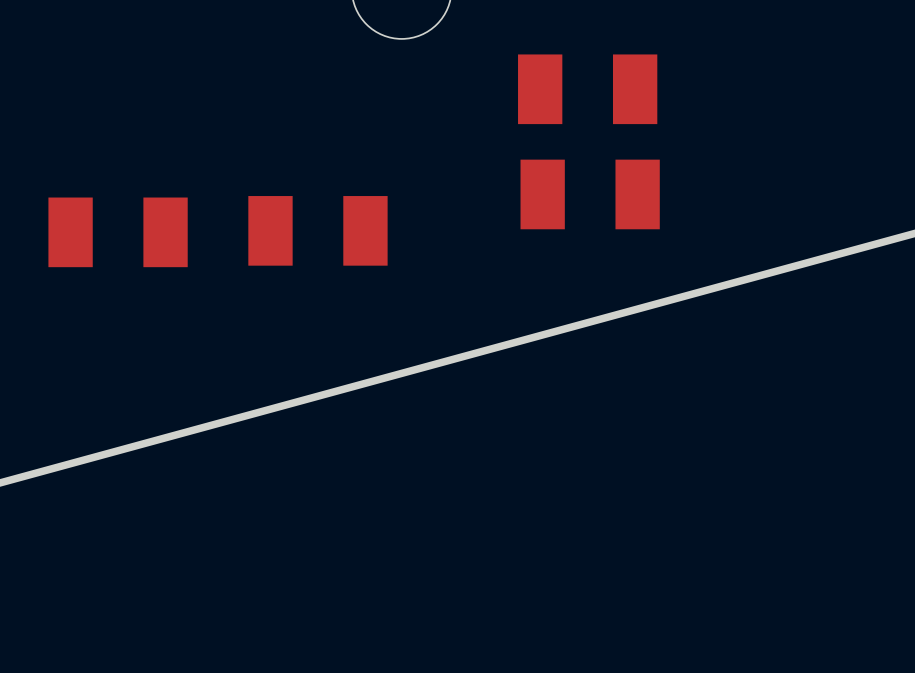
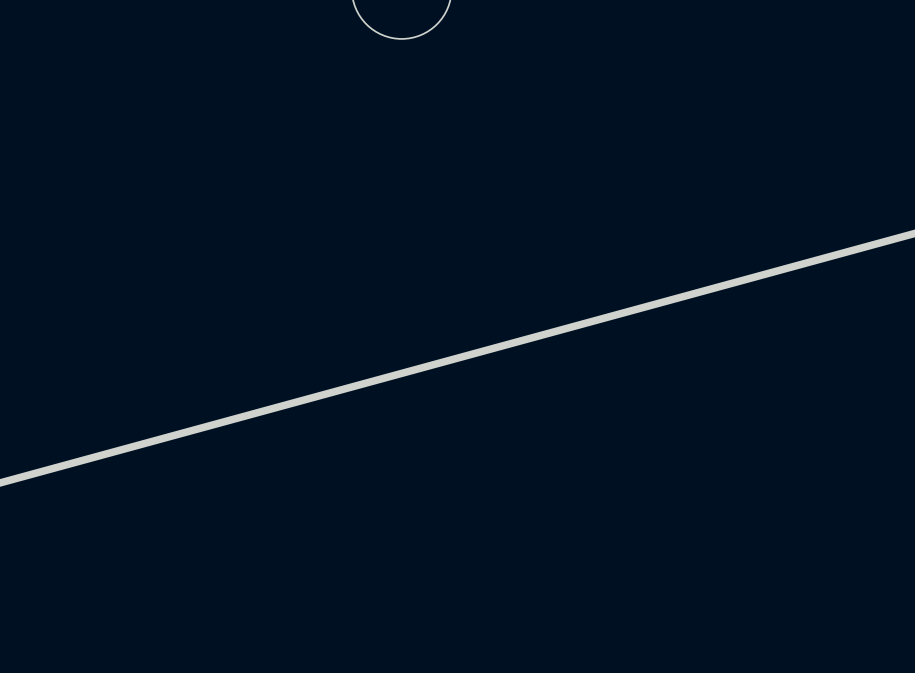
part: (587, 89) -> none
part: (590, 194) -> none
part: (317, 230) -> none
part: (118, 232) -> none

